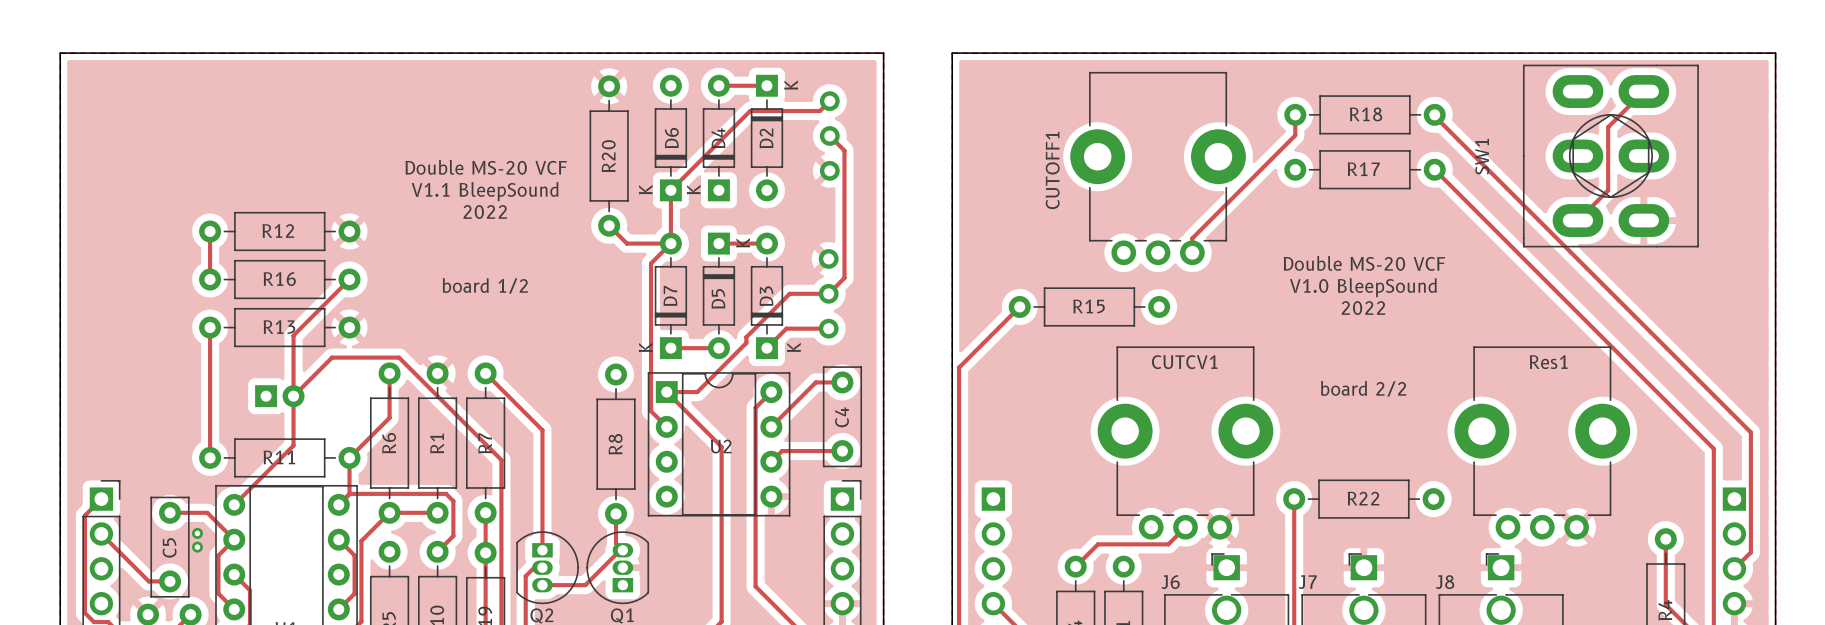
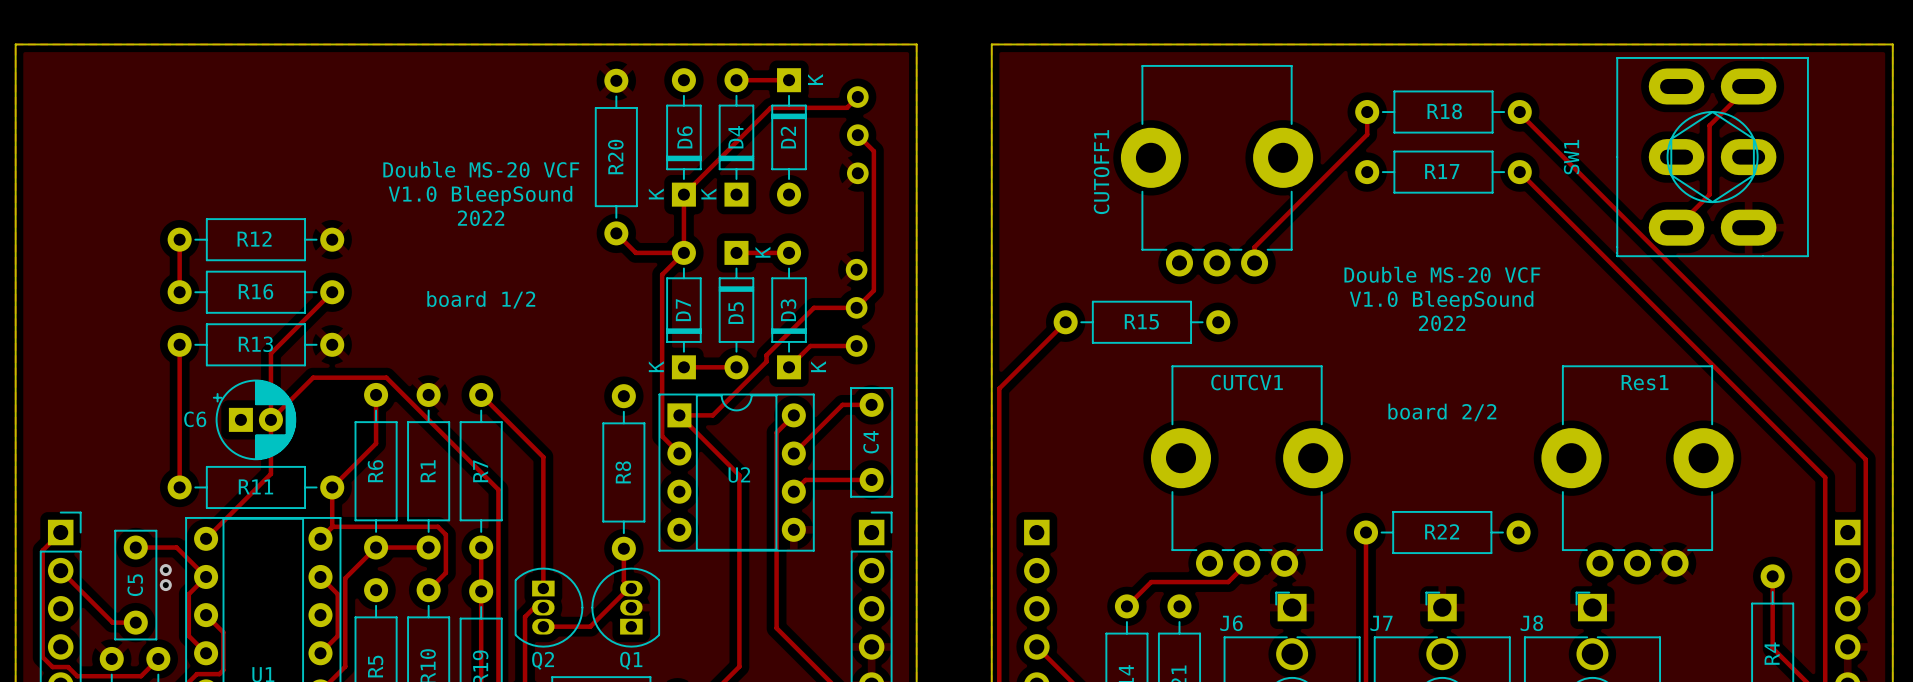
text: V1.1 BleepSound (485, 191) -> V1.0 BleepSound (480, 195)
C6 side: bottom (279, 396) -> top (254, 419)

